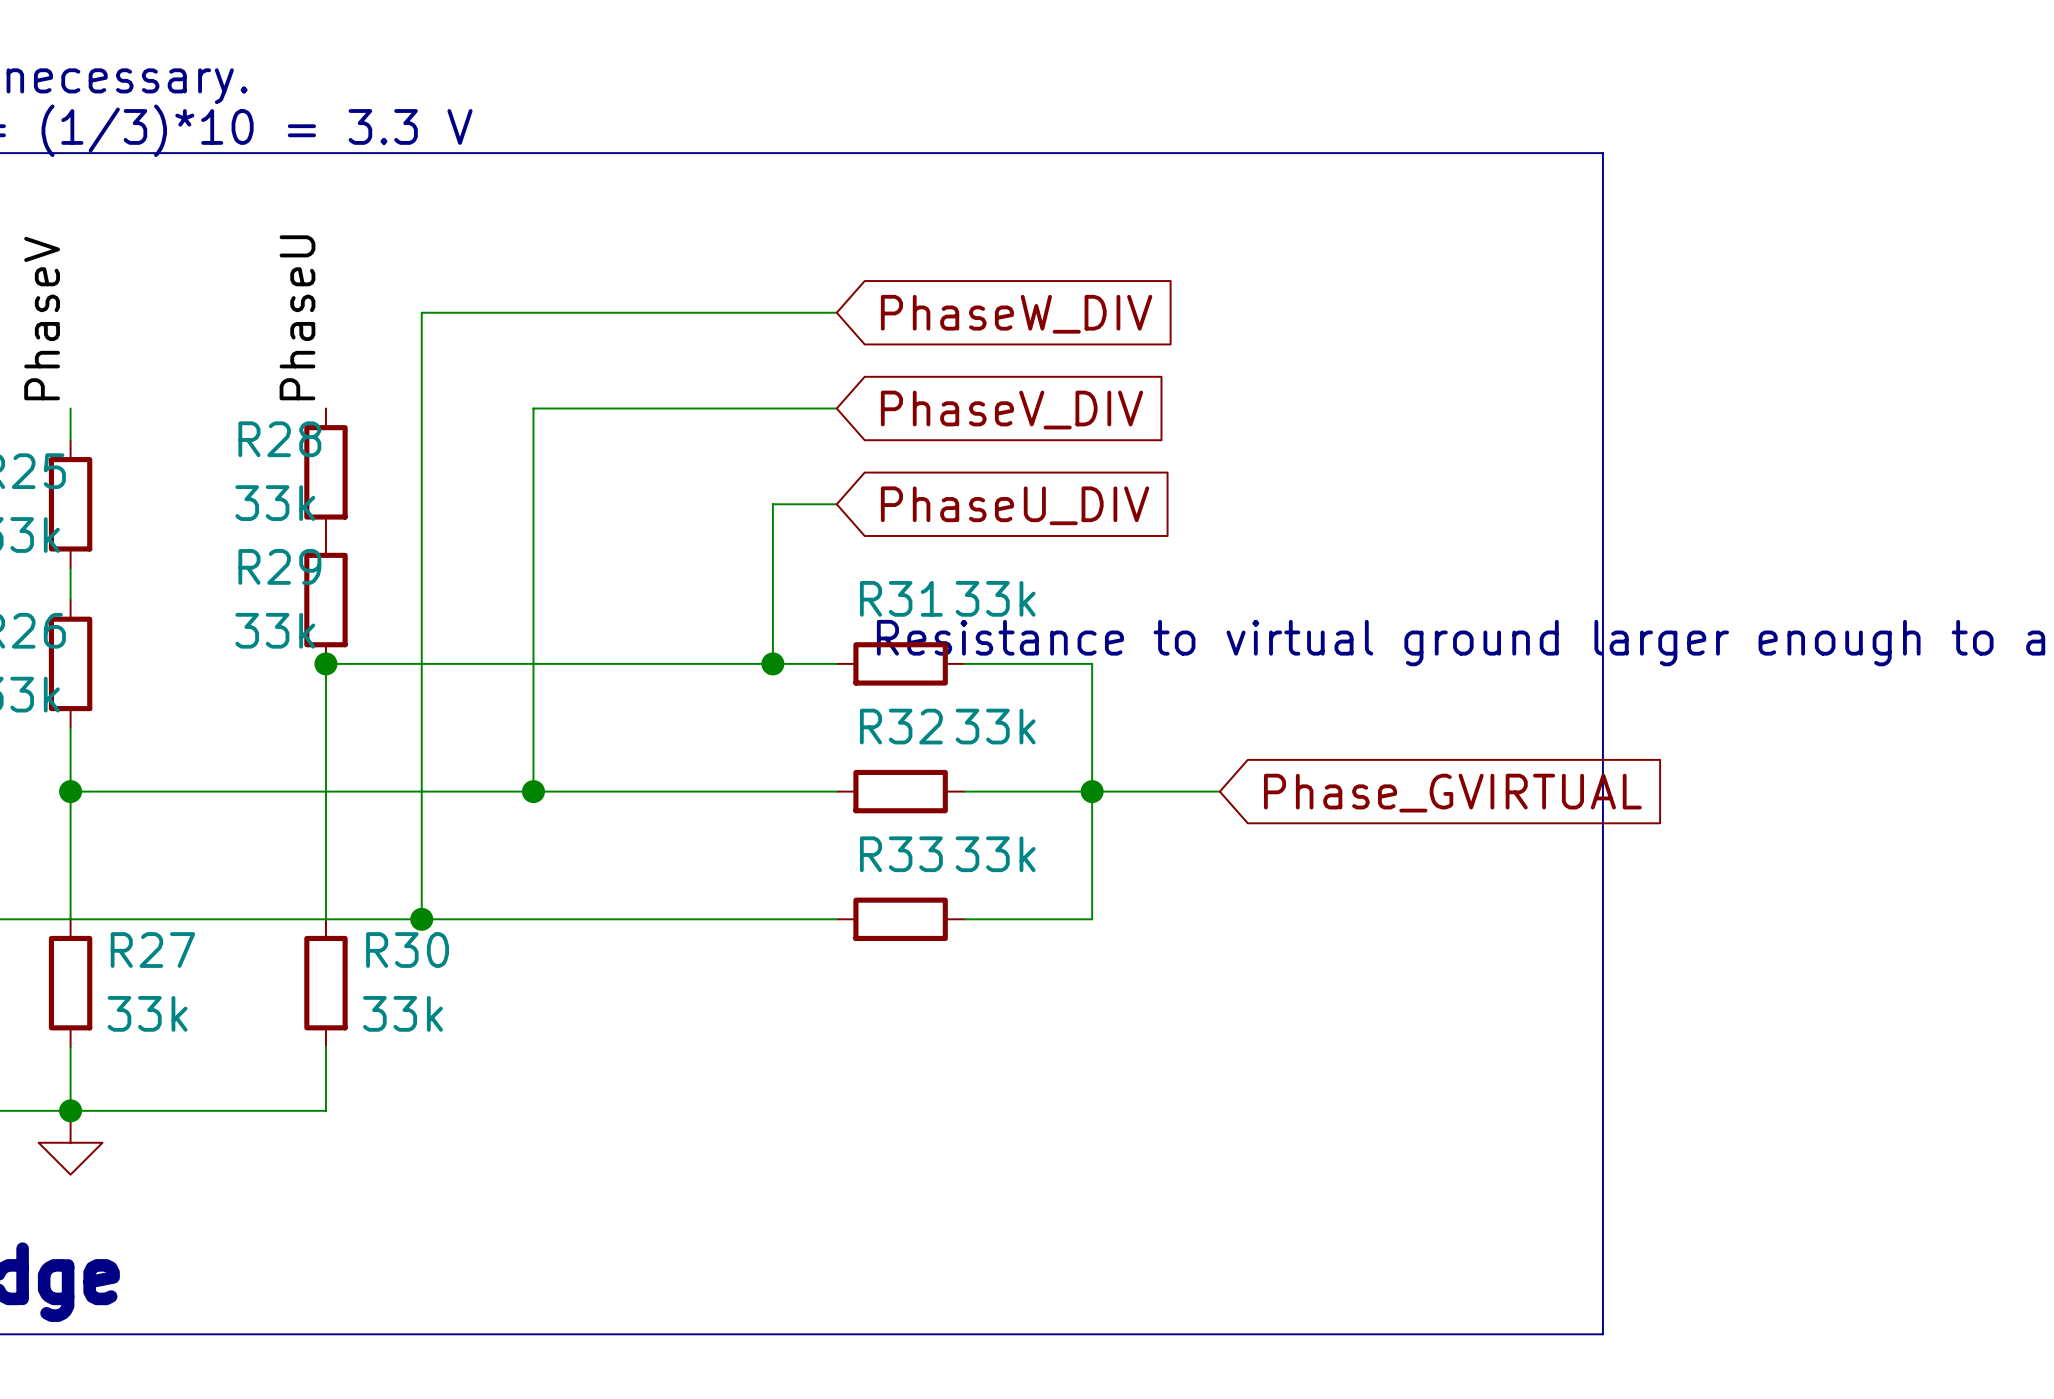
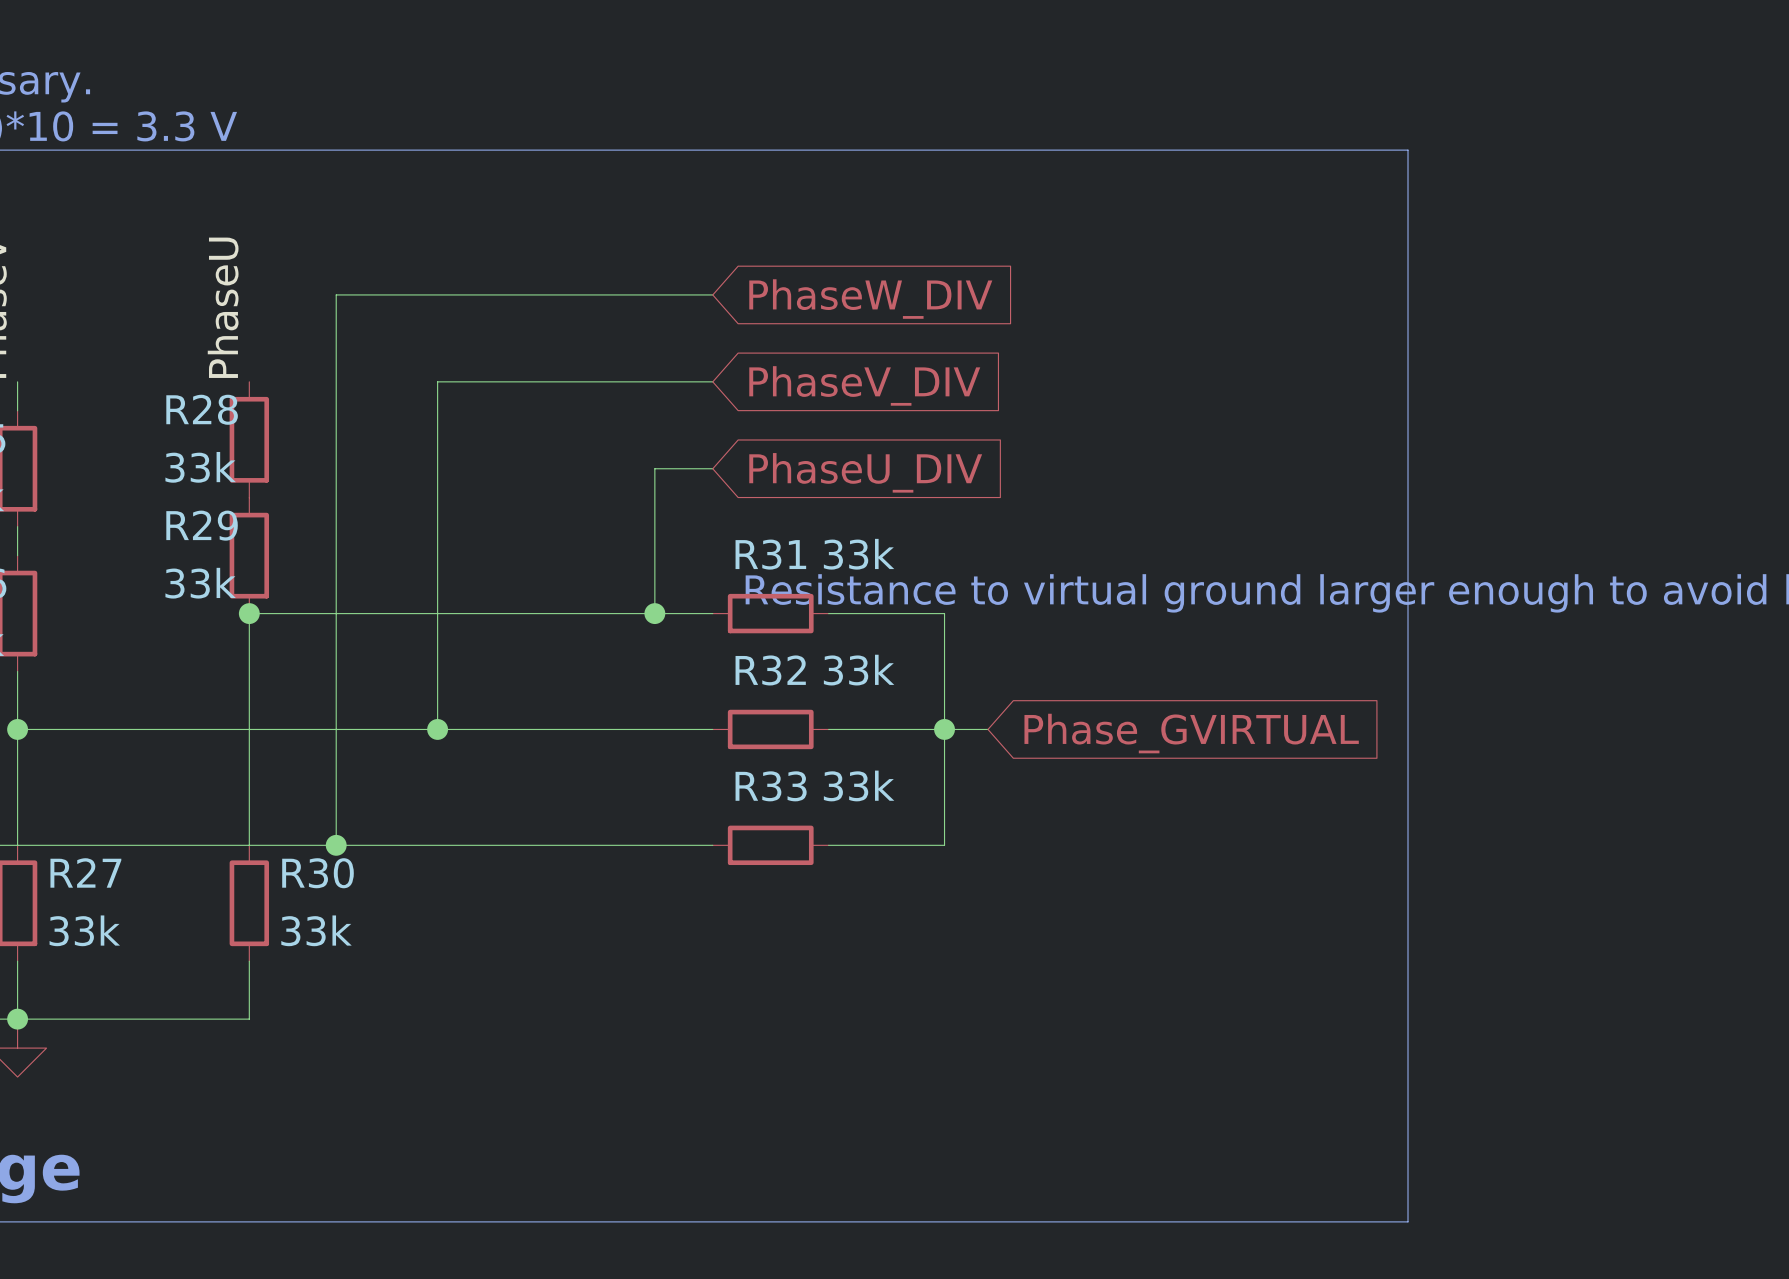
wire: (1140, 791) (1219, 791) -> none
global label position: Phase_GVIRTUAL (1452, 793) -> Phase_GVIRTUAL (1191, 733)

